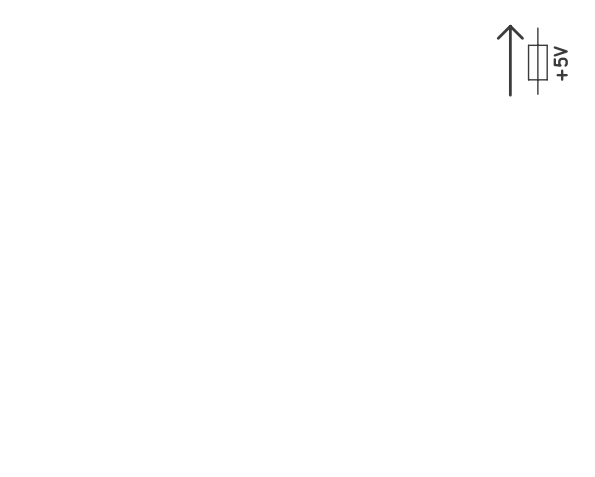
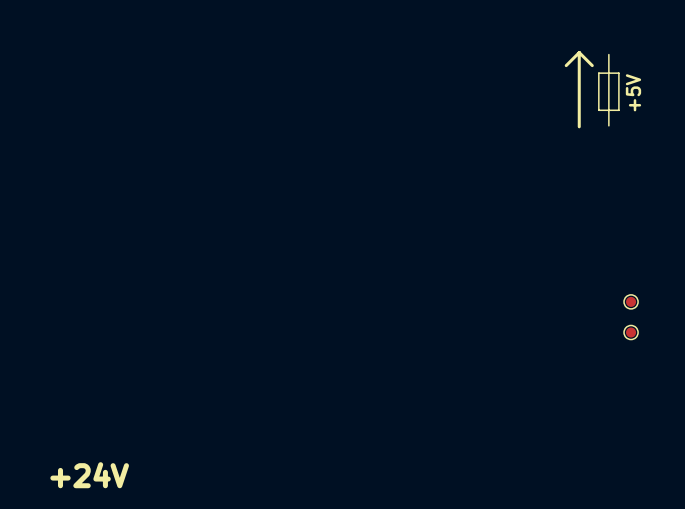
part: none -> (631, 301)
part: none -> (631, 332)
text: none -> +24V (89, 475)

